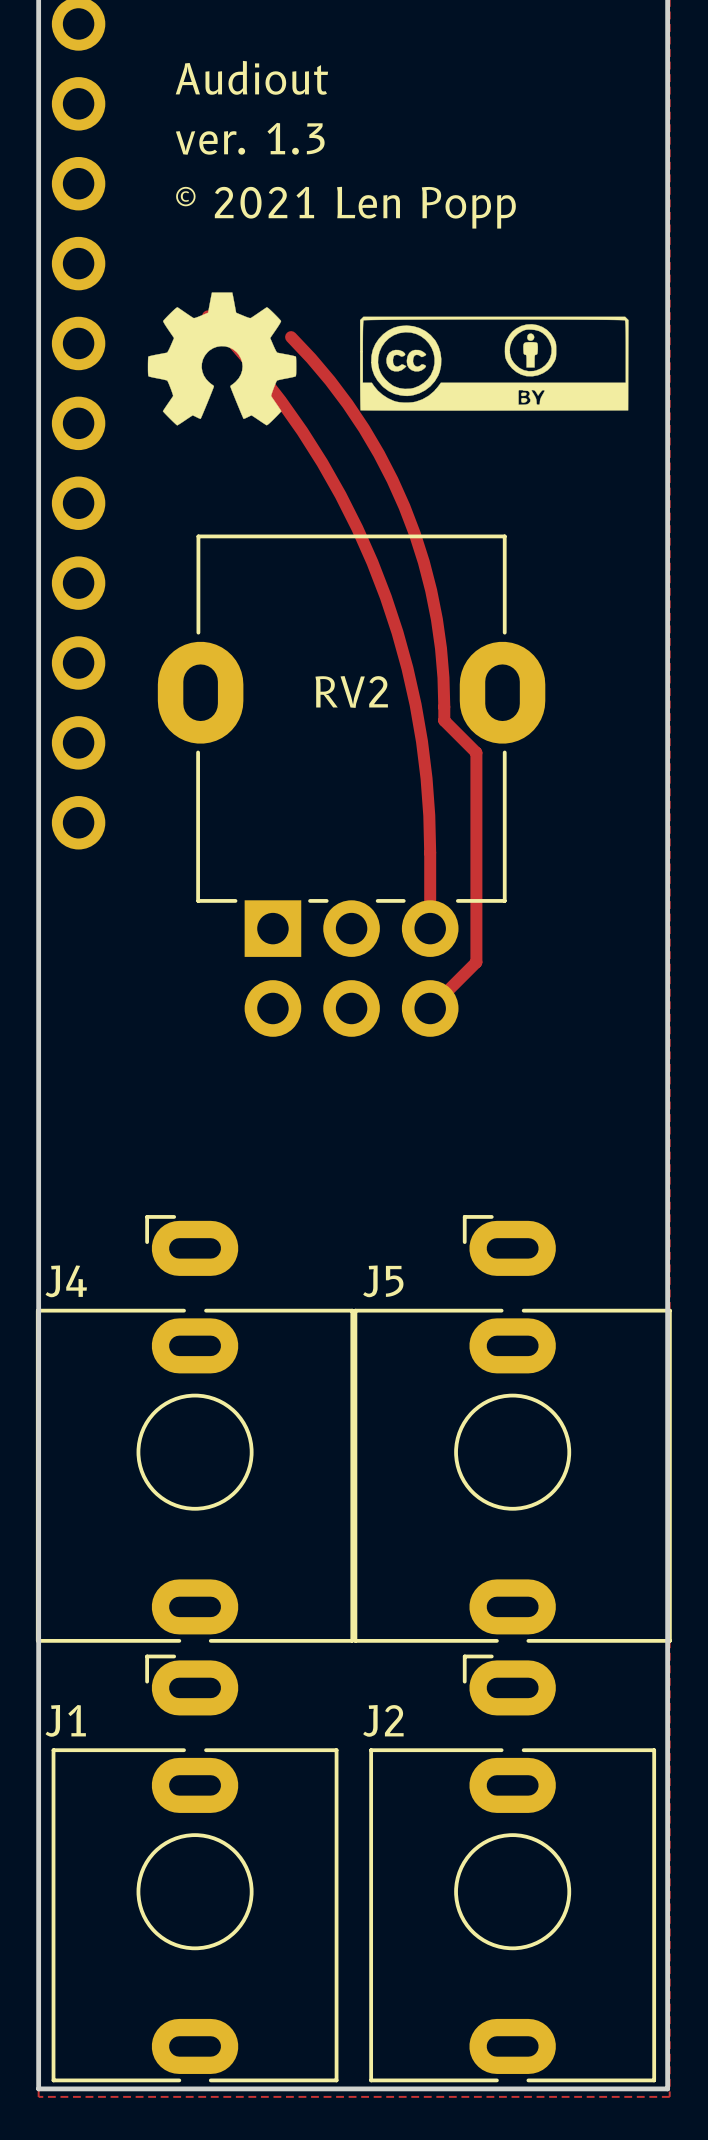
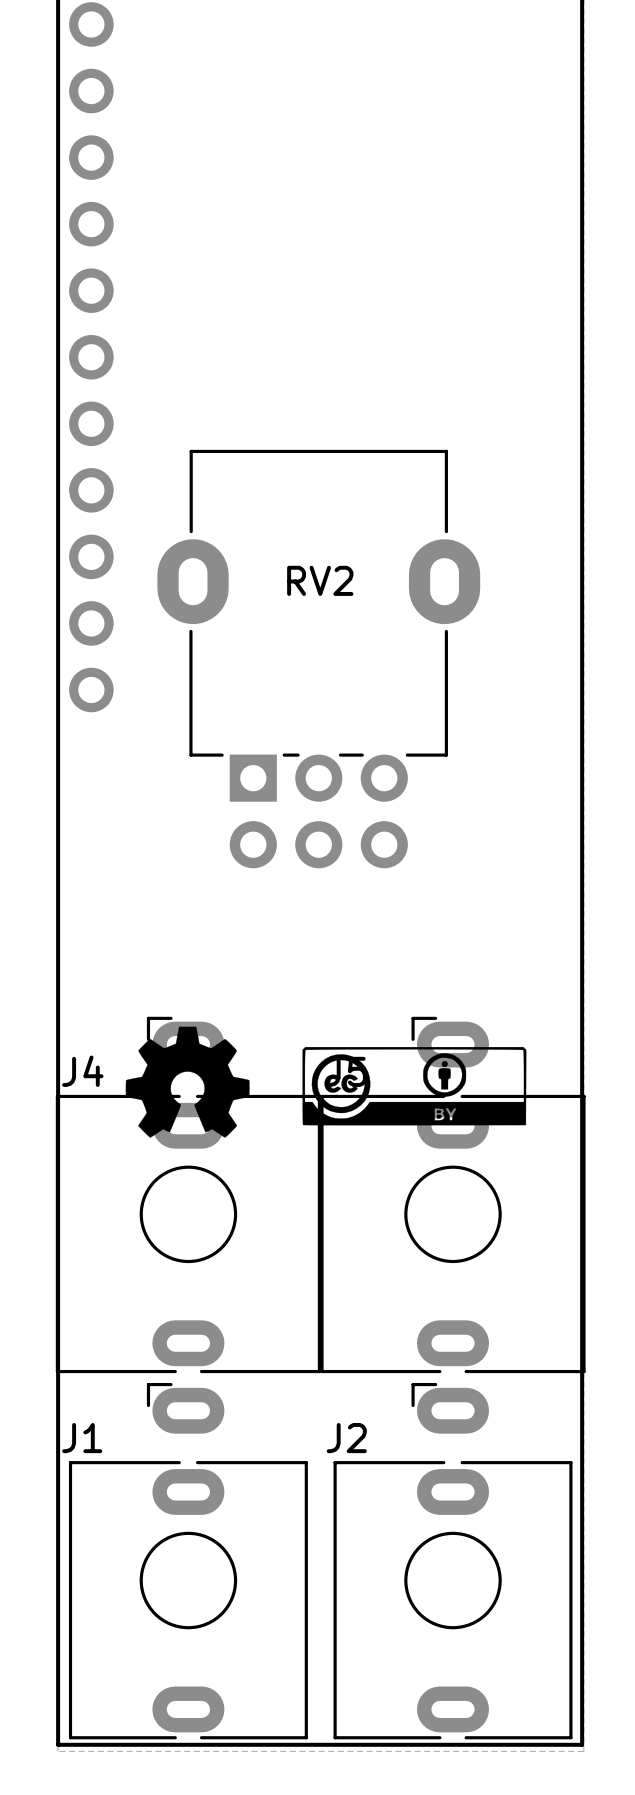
text: Audiout (251, 77) -> none
text: ver. 1.3 (250, 138) -> none
text: © 2021 Len Popp (345, 207) -> none
drawing: [147, 292, 297, 426] -> none
track: (207, 316) (257, 371) (302, 431) (340, 495) (372, 562) (385, 597) (407, 668) (421, 741) (429, 815) (430, 928) -> none
drawing: [360, 316, 629, 411] -> none
track: (291, 337) (311, 358) (347, 404) (379, 453) (404, 506) (423, 562) (436, 619) (443, 677) (444, 720) (476, 752) (476, 962) (430, 1008) -> none
drawing: none -> [125, 1026, 250, 1138]
drawing: none -> [302, 1047, 527, 1126]

